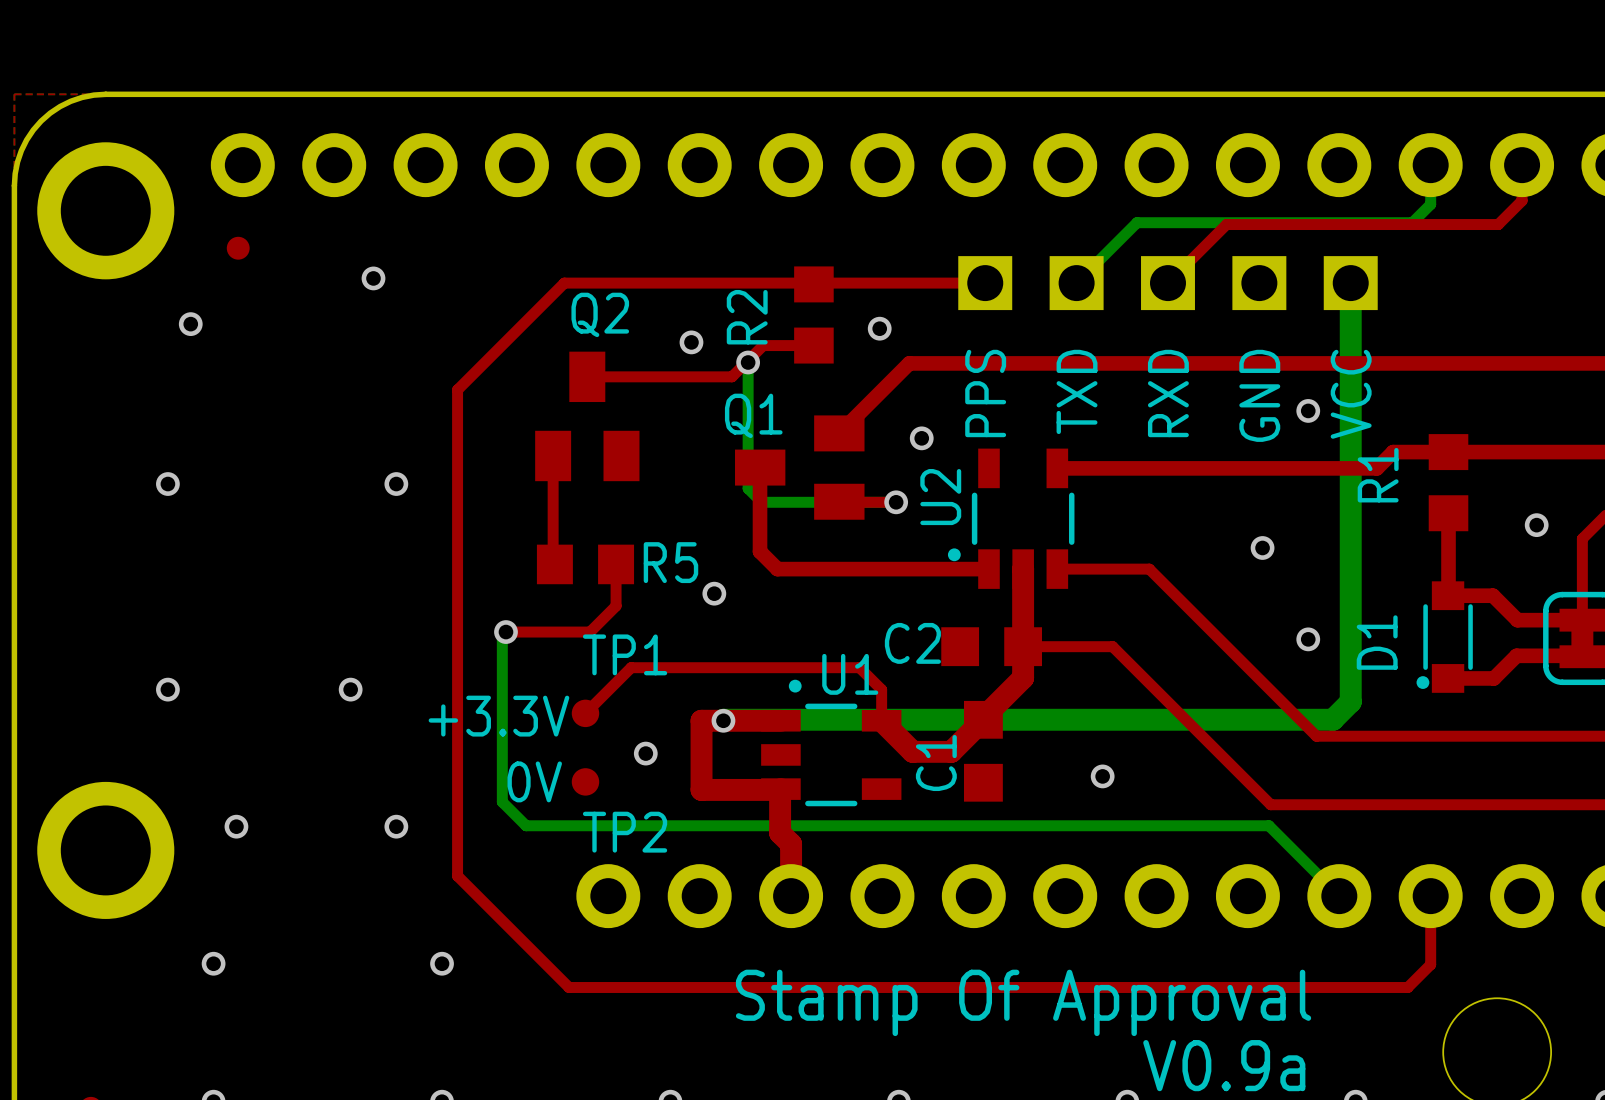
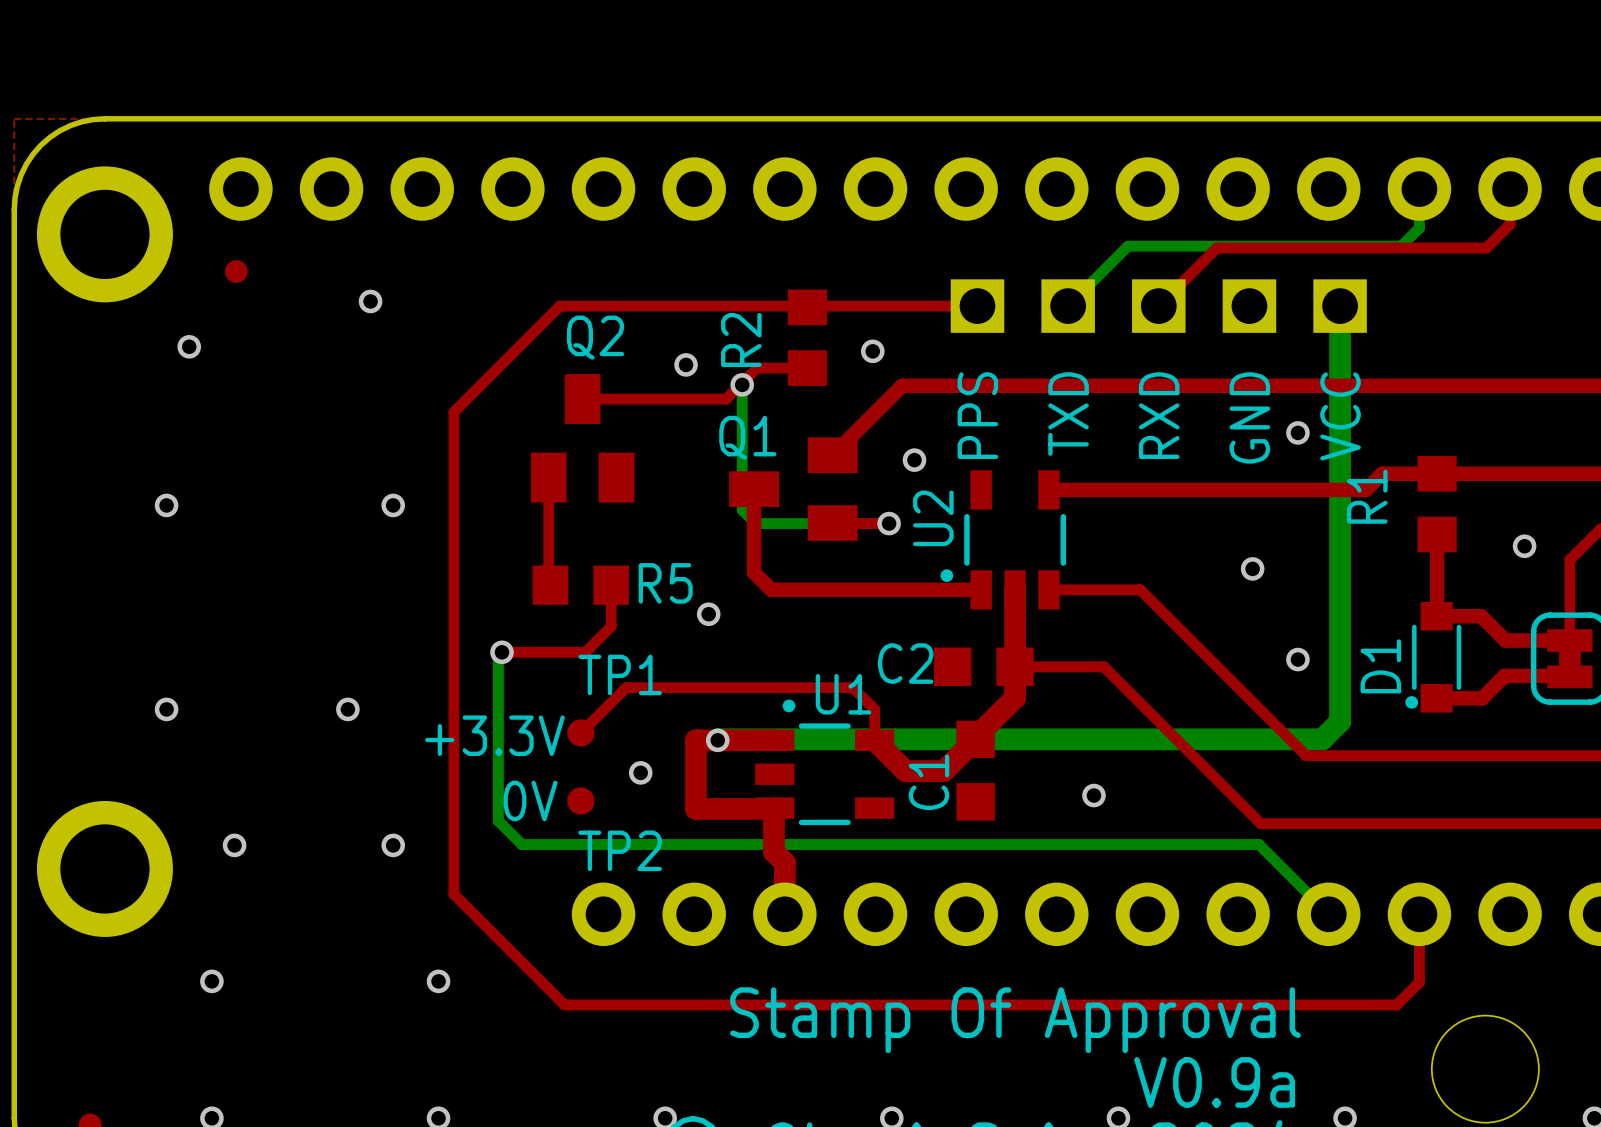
D1 name position: D1 (1377, 642) -> D1 (1380, 666)

